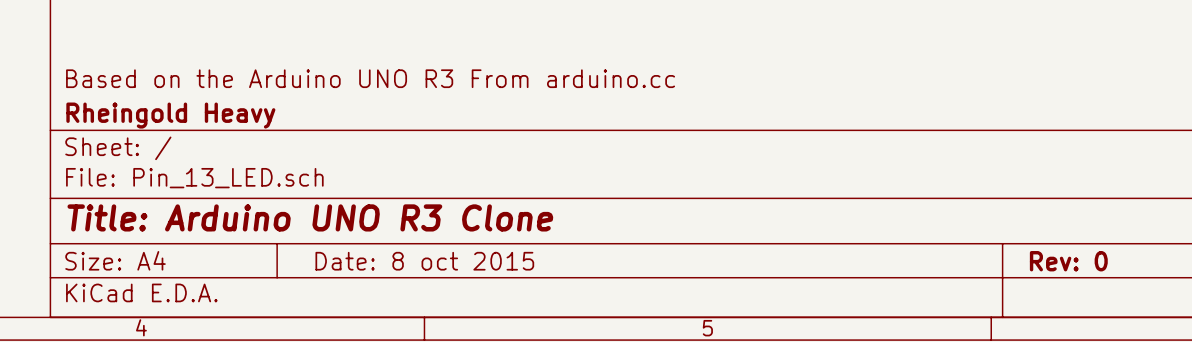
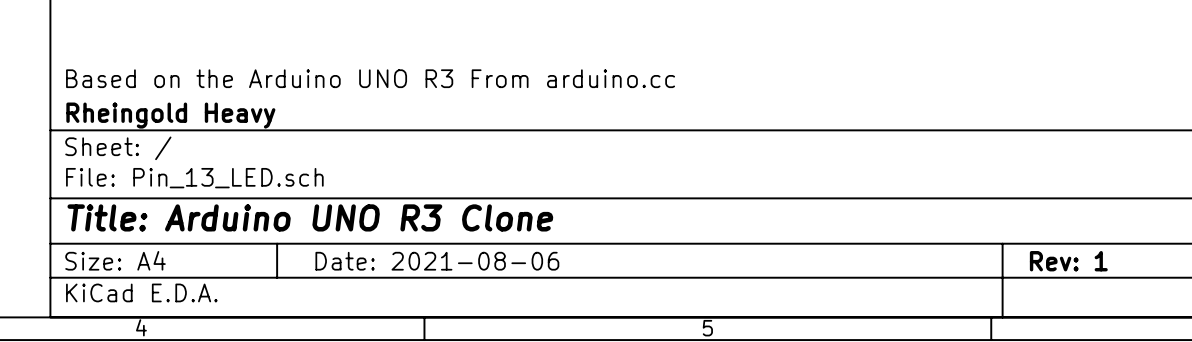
title block: Date: 8 oct 2015 (424, 261) -> Date: 2021-08-06 (437, 261)
title block: Rev: 0 (1068, 261) -> Rev: 1 (1068, 261)

